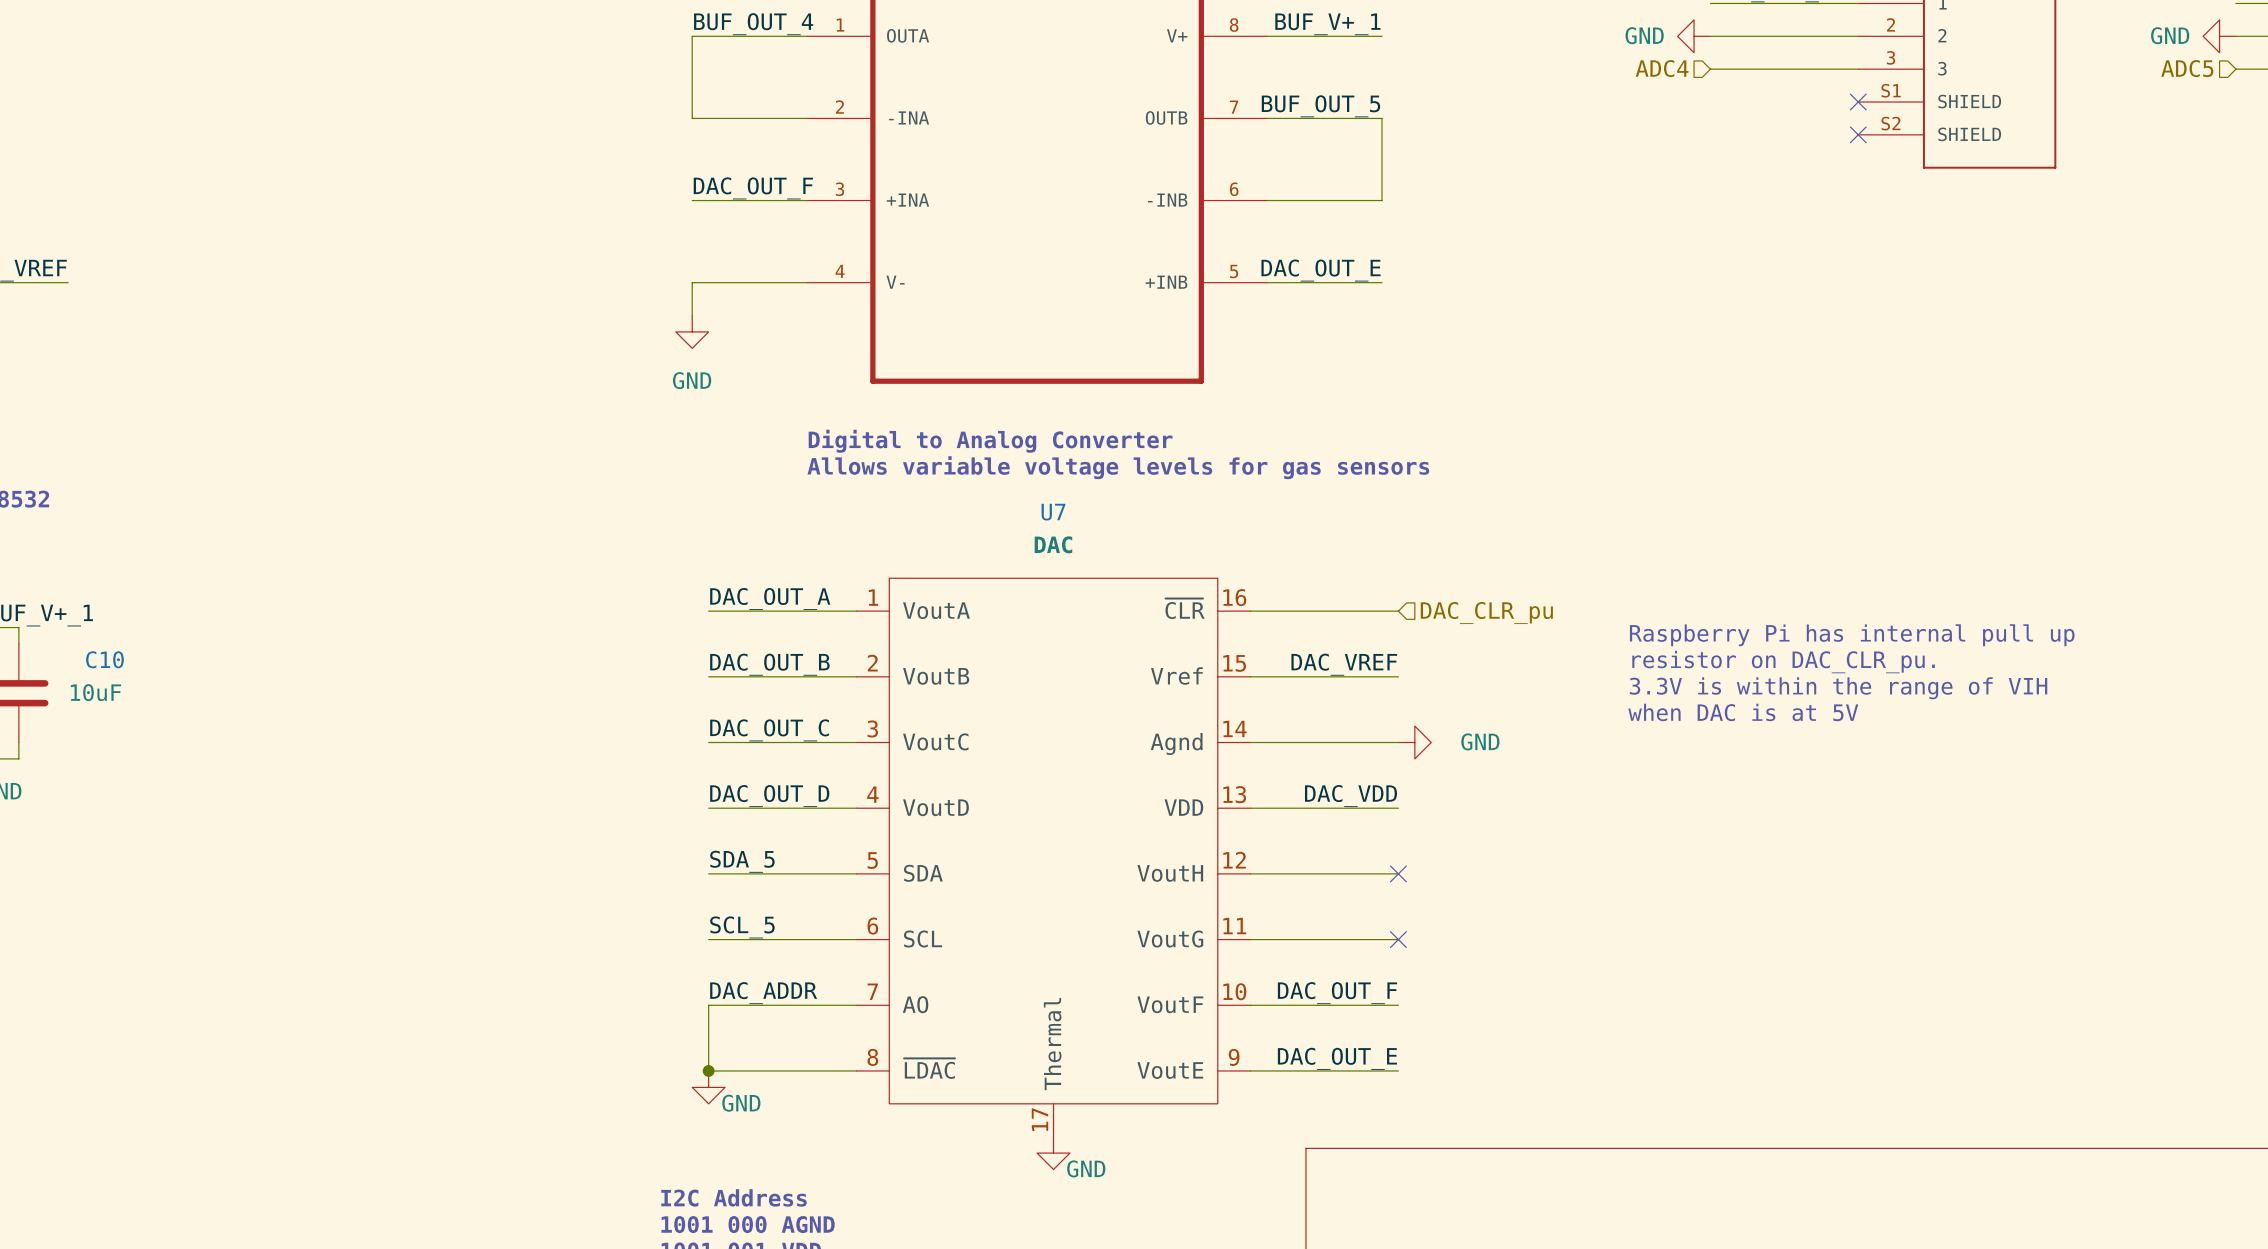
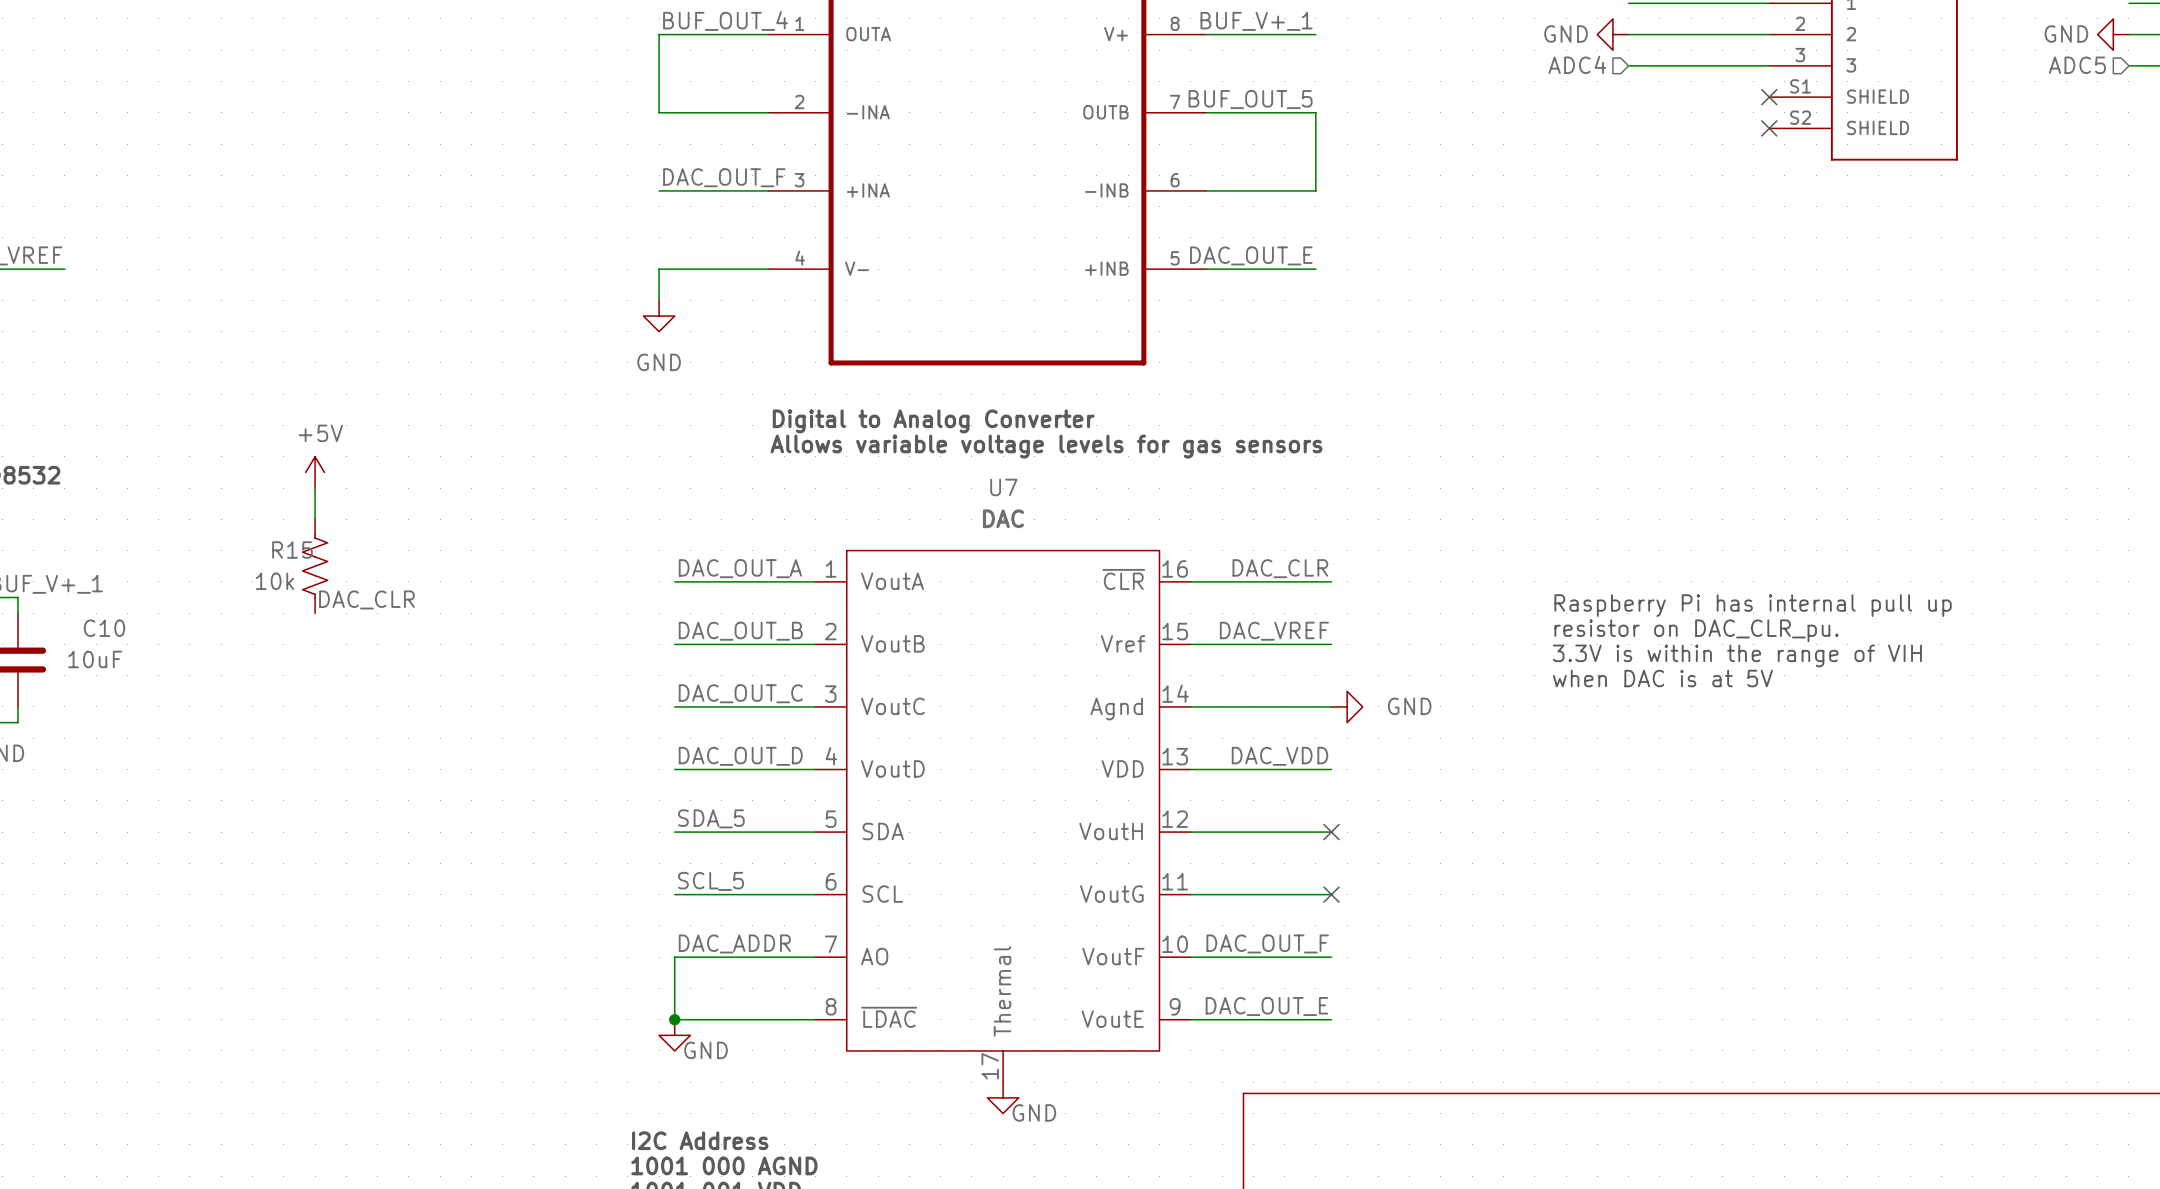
power symbol: none -> +5V (315, 472)
wire: none -> (315, 488) (315, 519)
R15: none -> 10k (315, 566)
label: none -> DAC_CLR (1280, 568)
hierarchical label: DAC_CLR_pu (1486, 613) -> none
label: none -> DAC_CLR (366, 599)

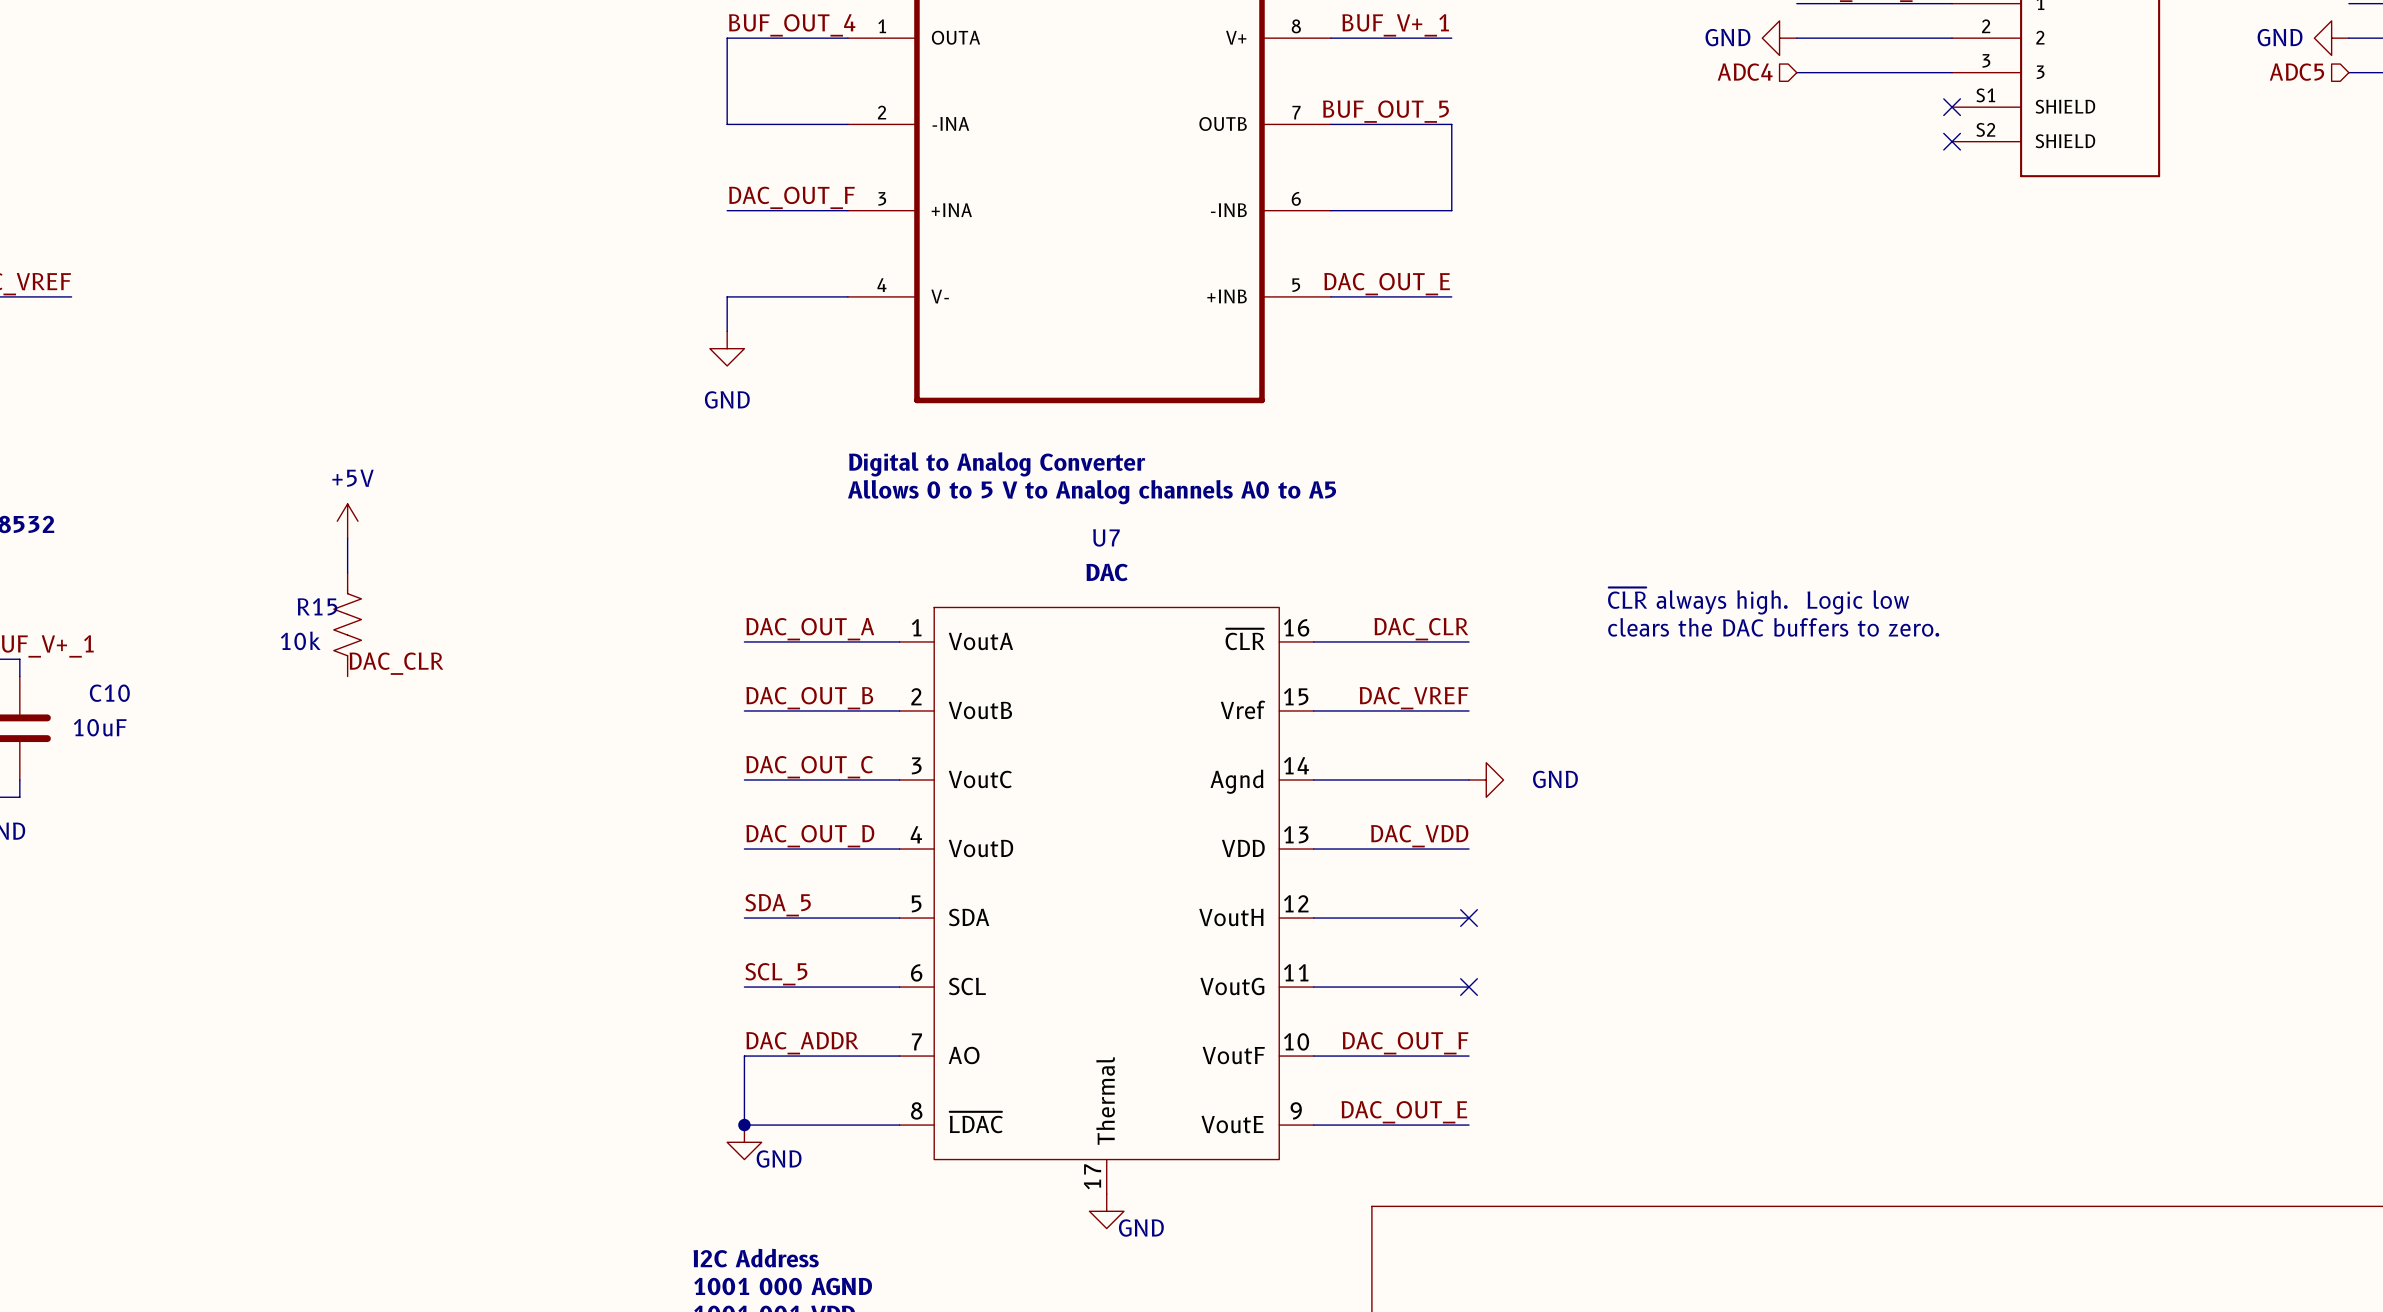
text: Allows variable voltage levels for gas sensors (1046, 446) -> Allows 0 to 5 V to Analog channels A0 to A5 (1092, 492)
text: none -> ~{CLR} always high. Logic low (1758, 601)
text: none -> clears the DAC buffers to zero. (1773, 627)
text: Raspberry Pi has internal pull up (1753, 605) -> none
text: resistor on DAC_CLR_pu. (1696, 630) -> none
text: 3.3V is within the range of VIH (1737, 655) -> none
text: when DAC is at 5V (1662, 678) -> none

